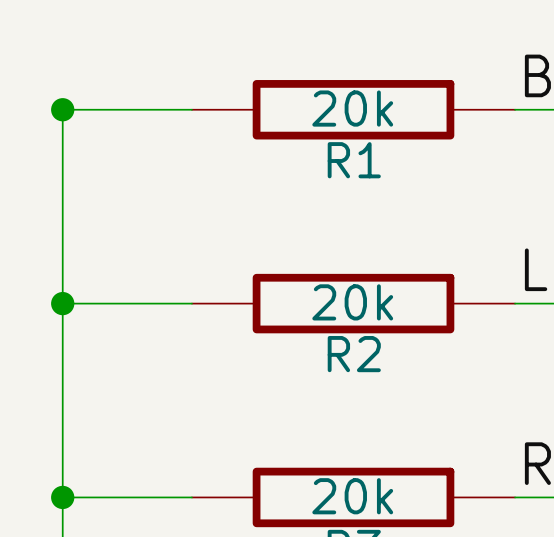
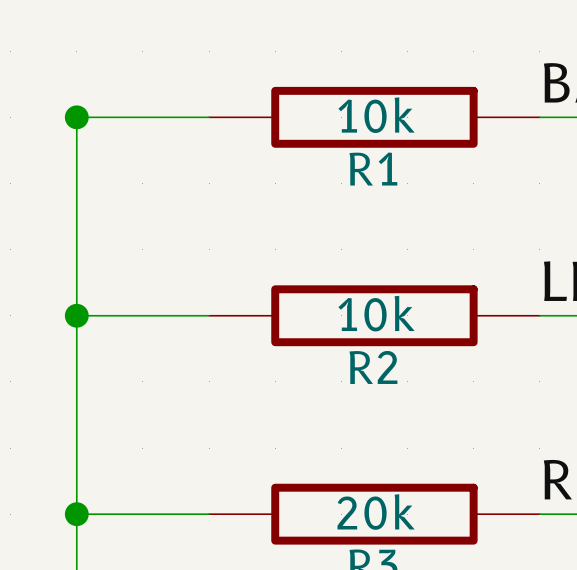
R1 value: 20k (352, 108) -> 10k (376, 115)
R2 value: 20k (352, 302) -> 10k (376, 313)

